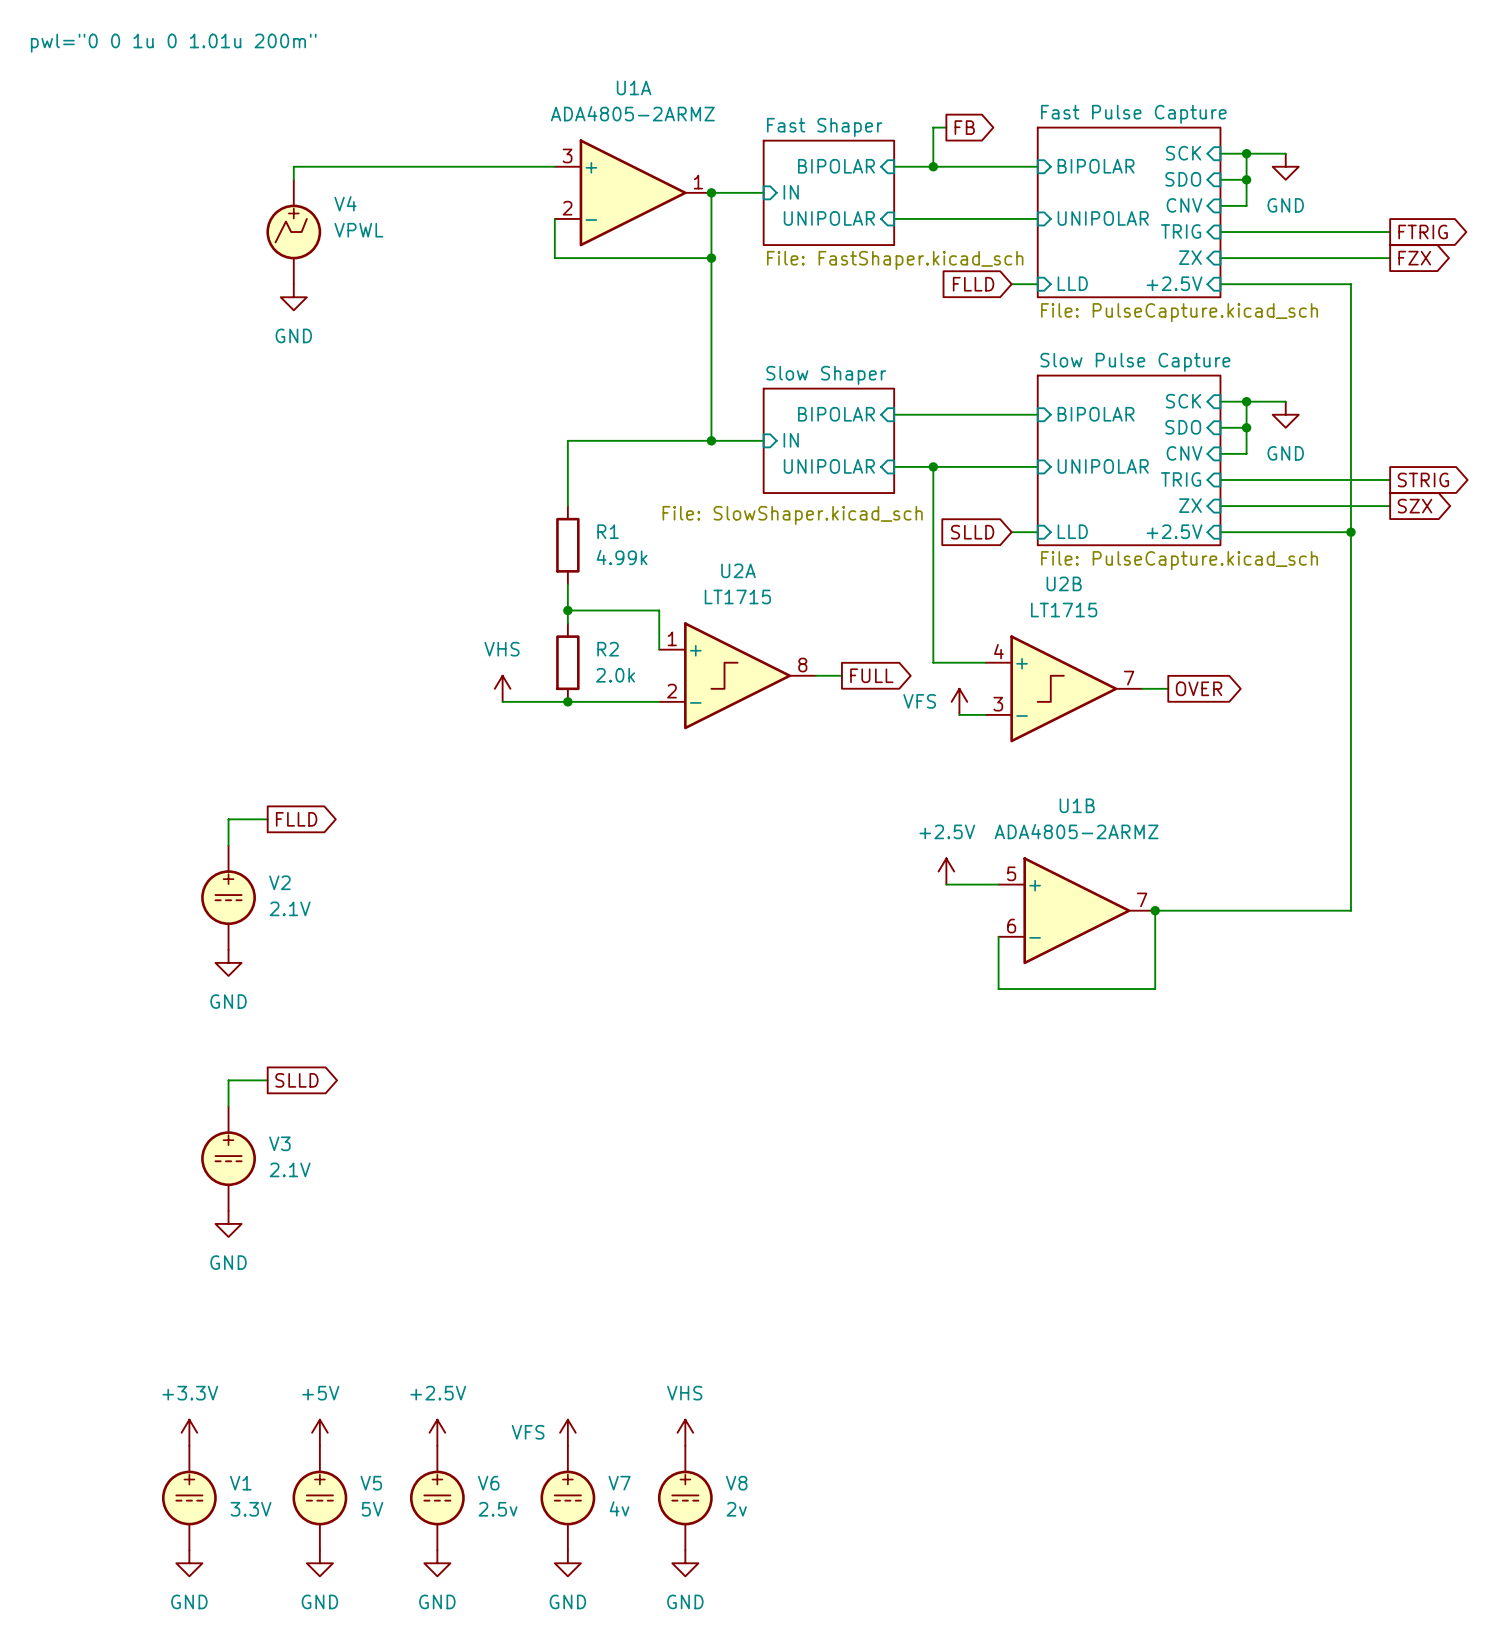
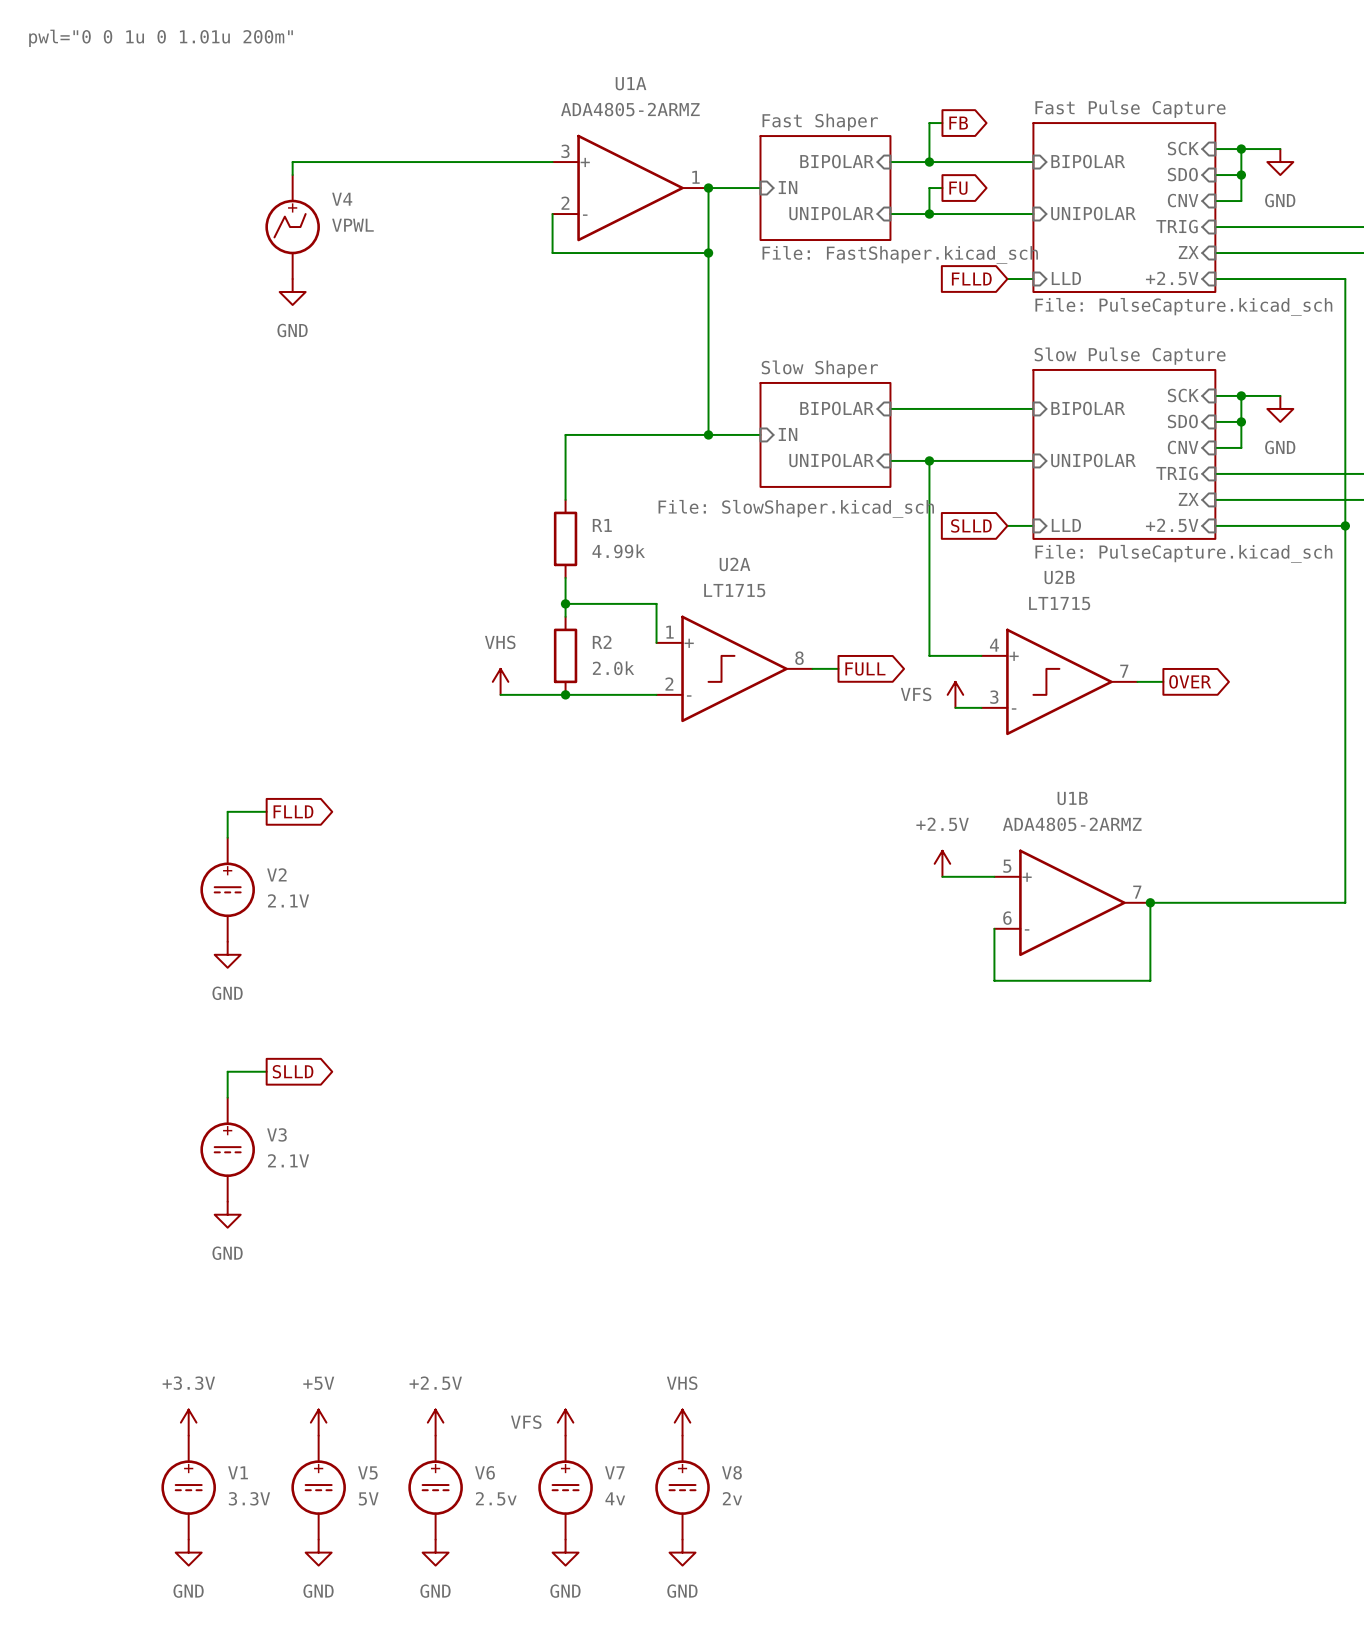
wire: none -> (942, 188) (929, 188) (929, 214)
global label: none -> FU (958, 188)
junction: none -> (929, 214)

